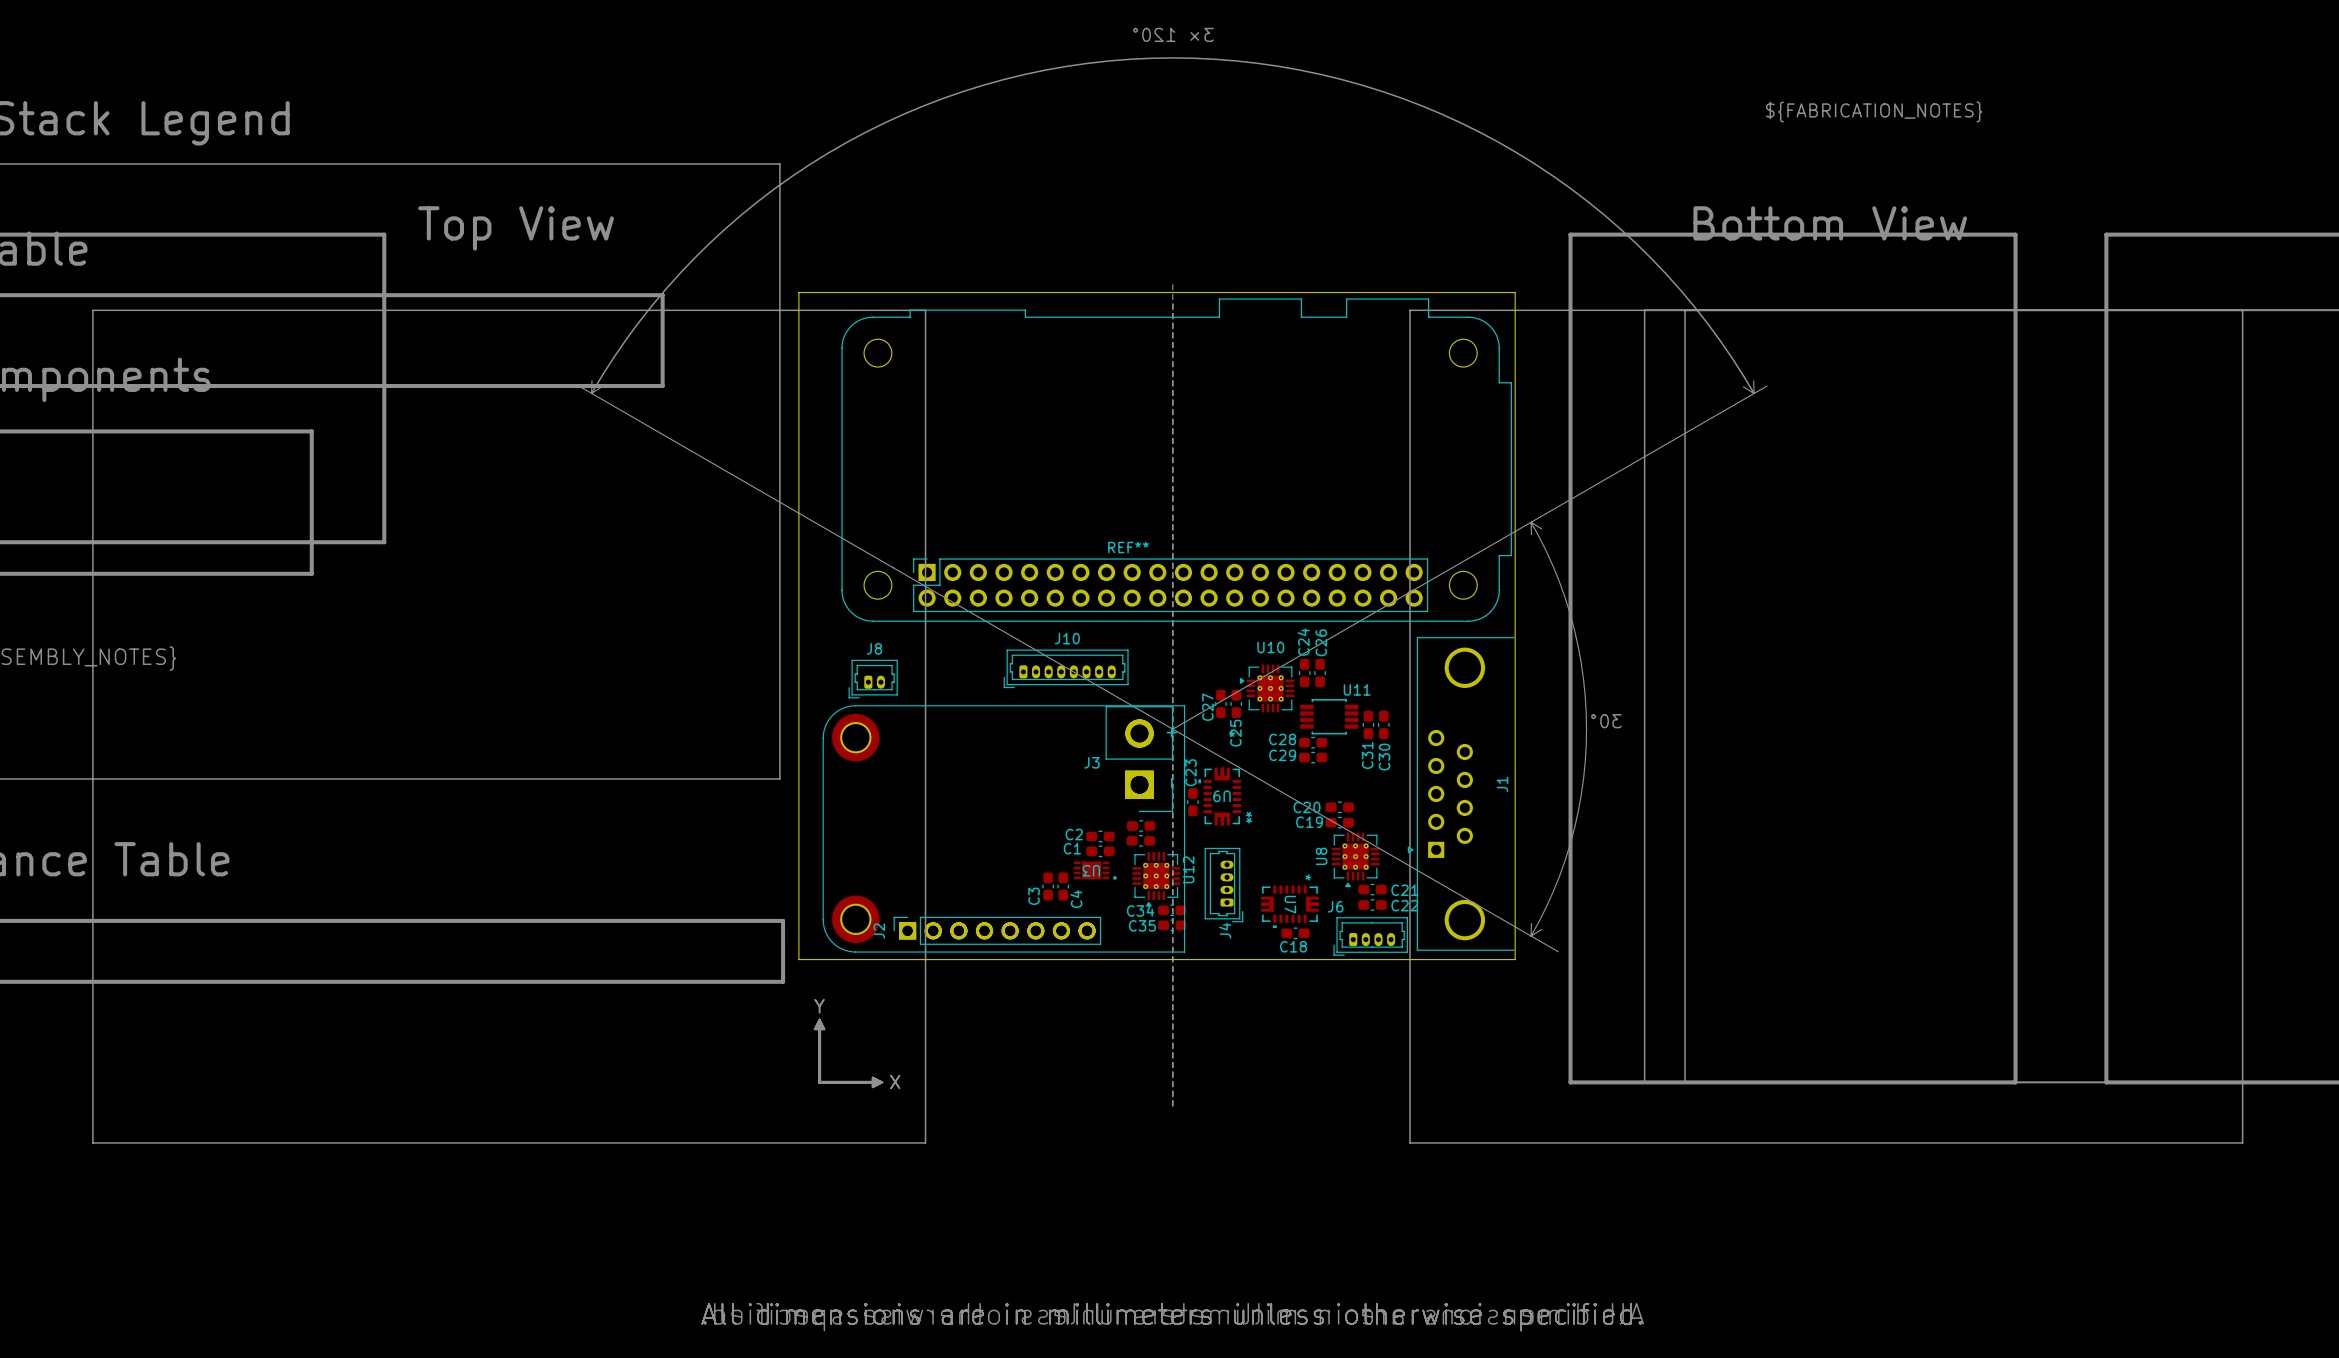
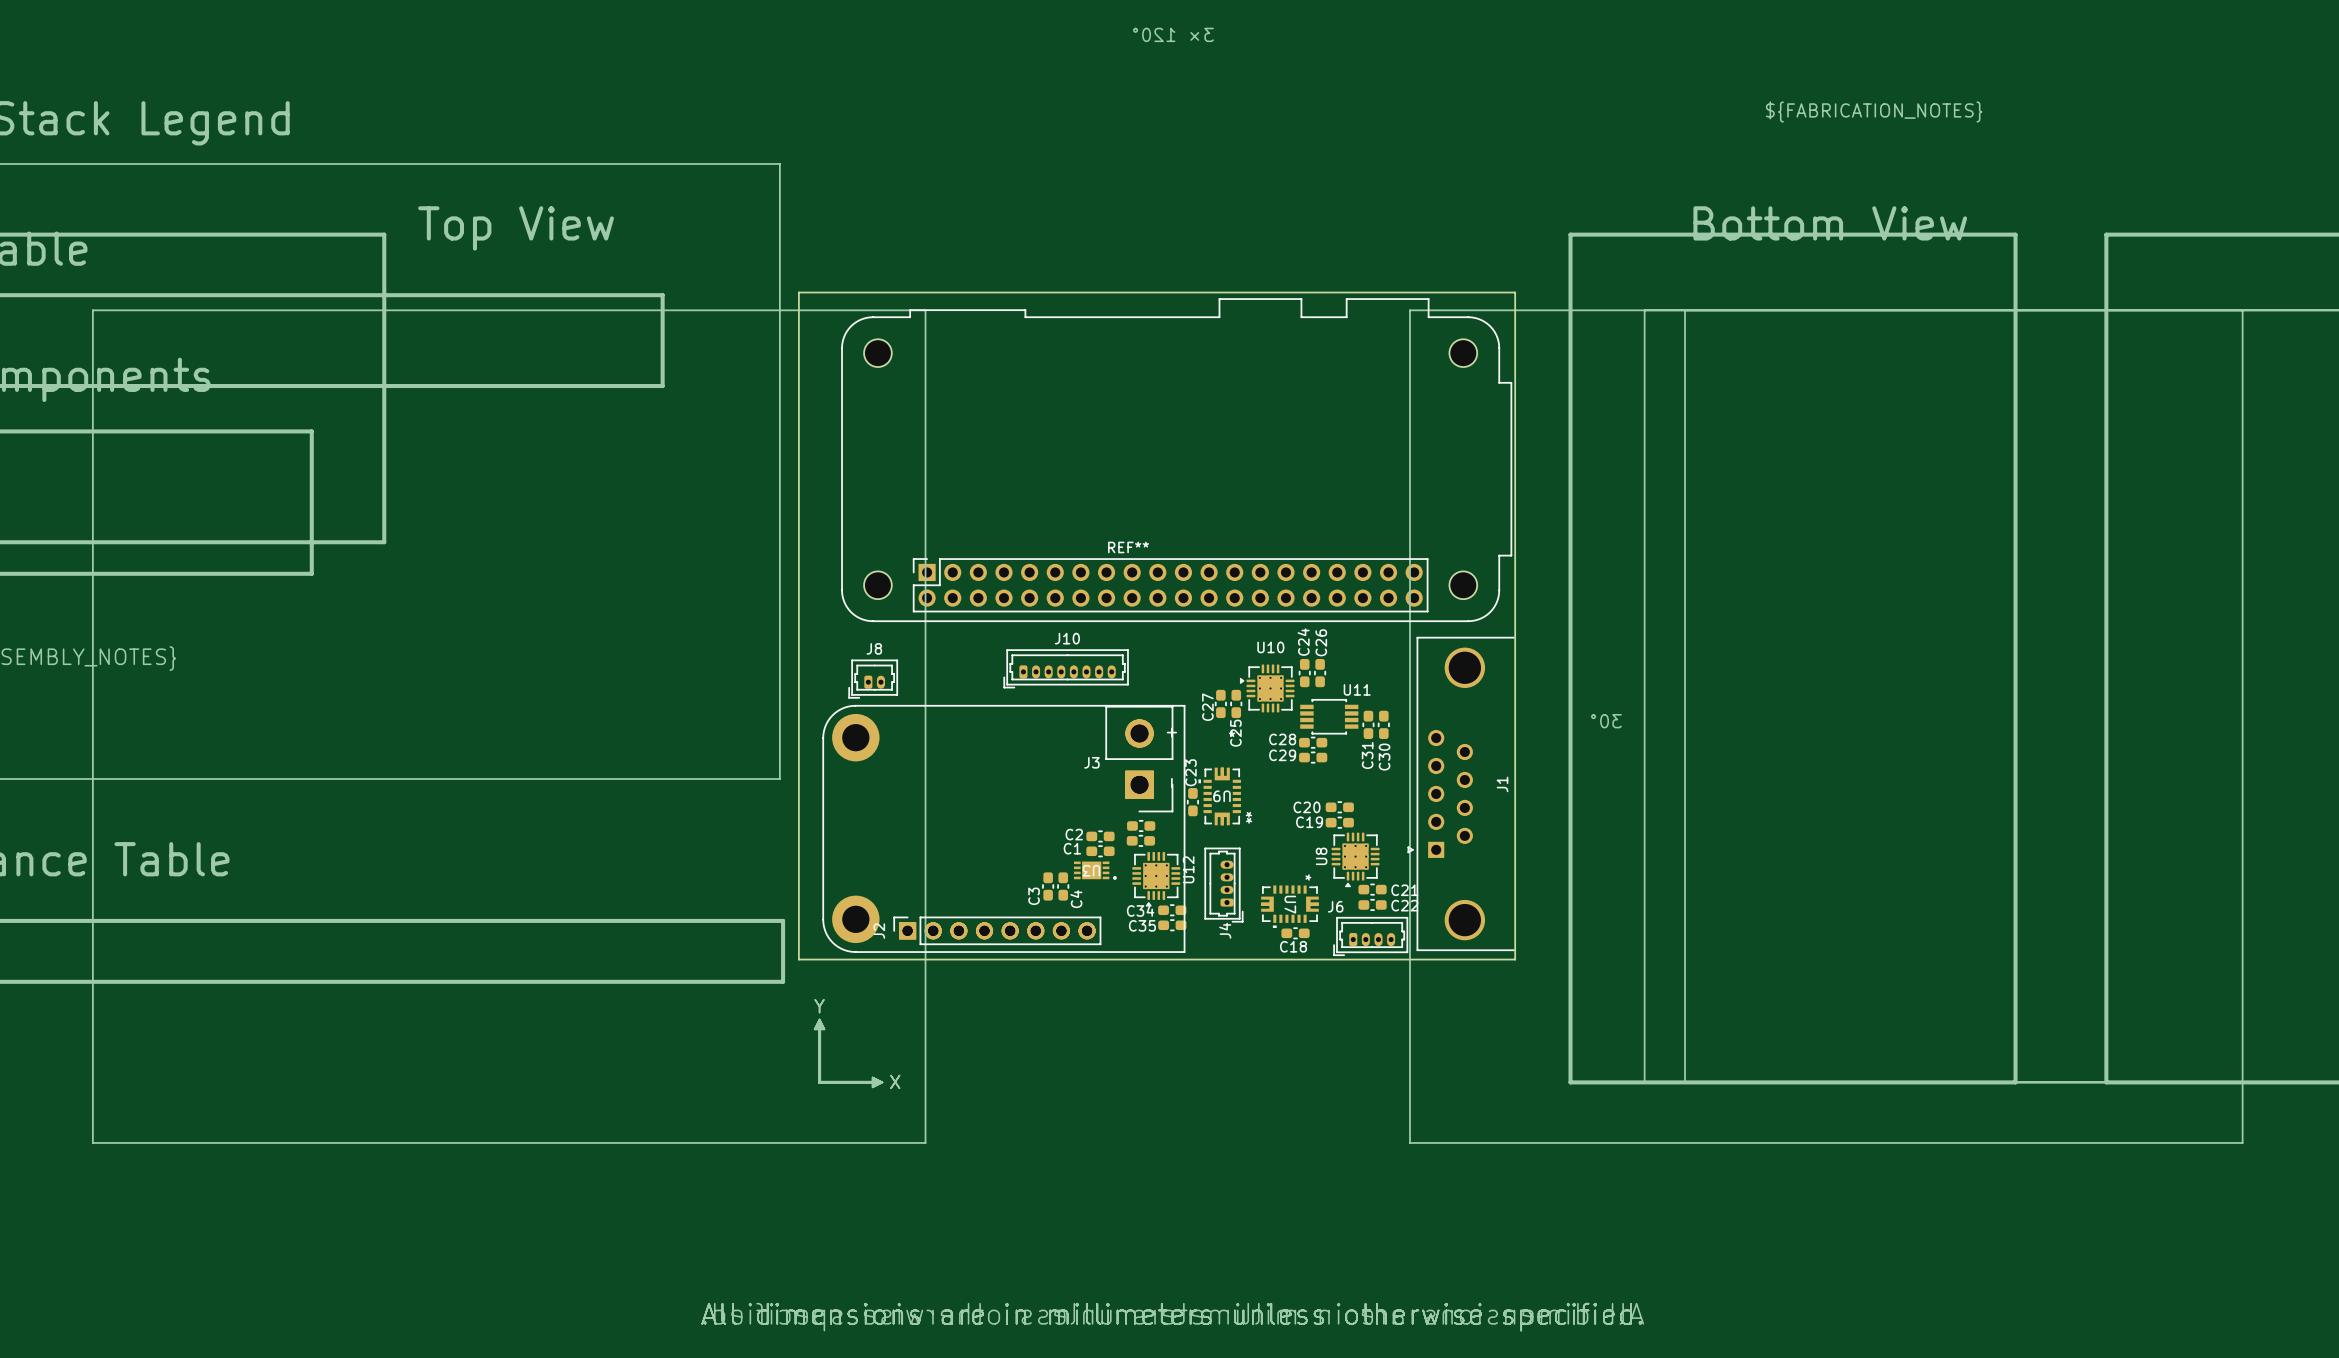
line: (1172, 282) (1172, 1106) -> none
line: (592, 380) (591, 393) -> none
line: (1753, 380) (1754, 393) -> none
line: (578, 385) (1558, 951) -> none
line: (1767, 385) (1172, 729) -> none
line: (602, 386) (591, 393) -> none
line: (1743, 386) (1754, 393) -> none
line: (591, 393) (638, 322) (694, 258) (758, 201) (828, 153) (865, 132) (923, 105) (1004, 79) (1087, 63) (1172, 57) (1257, 63) (1320, 74) (1361, 85) (1441, 114) (1517, 153) (1587, 201) (1651, 258) (1706, 322) (1754, 393) -> none
line: (1531, 522) (1541, 528) -> none
line: (1531, 522) (1531, 534) -> none
line: (1531, 522) (1553, 566) (1574, 630) (1583, 679) (1586, 729) (1583, 779) (1574, 828) (1559, 875) (1531, 936) -> none
line: (1531, 923) (1531, 936) -> none
line: (1541, 929) (1531, 936) -> none

